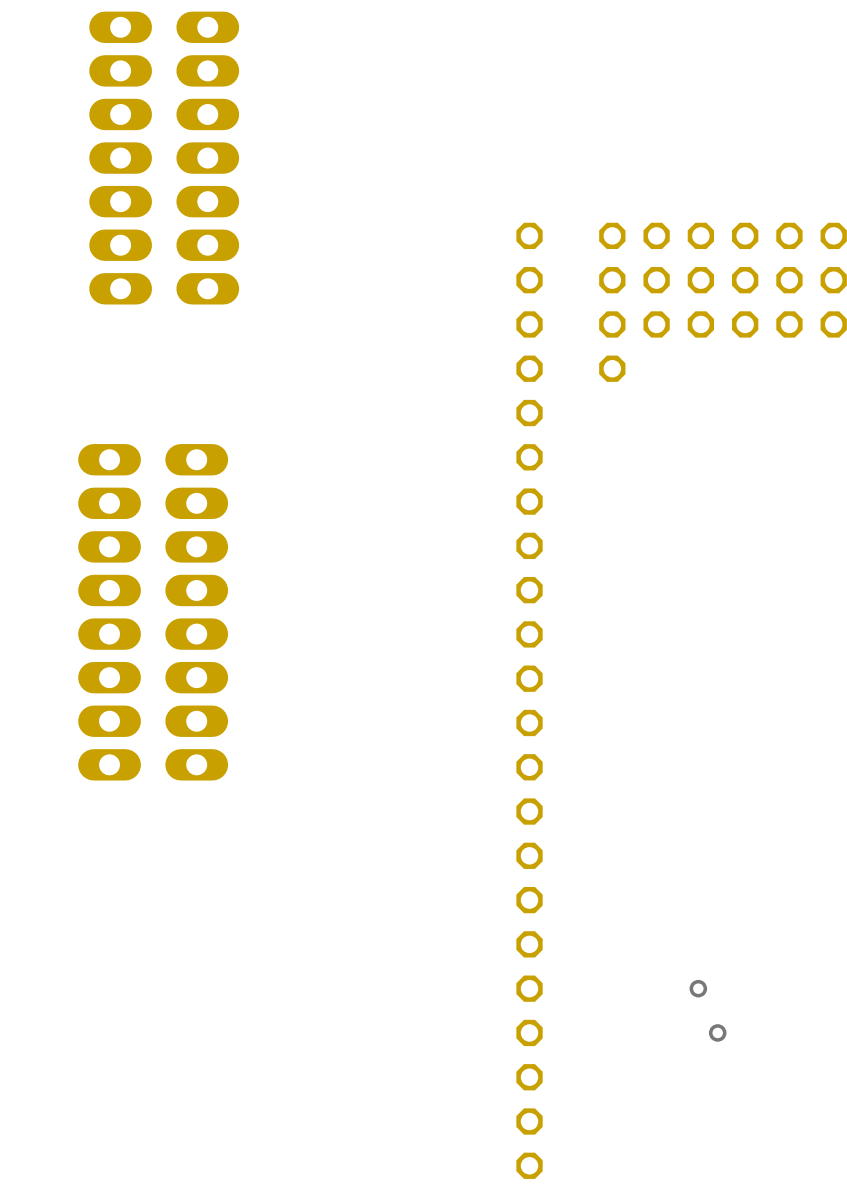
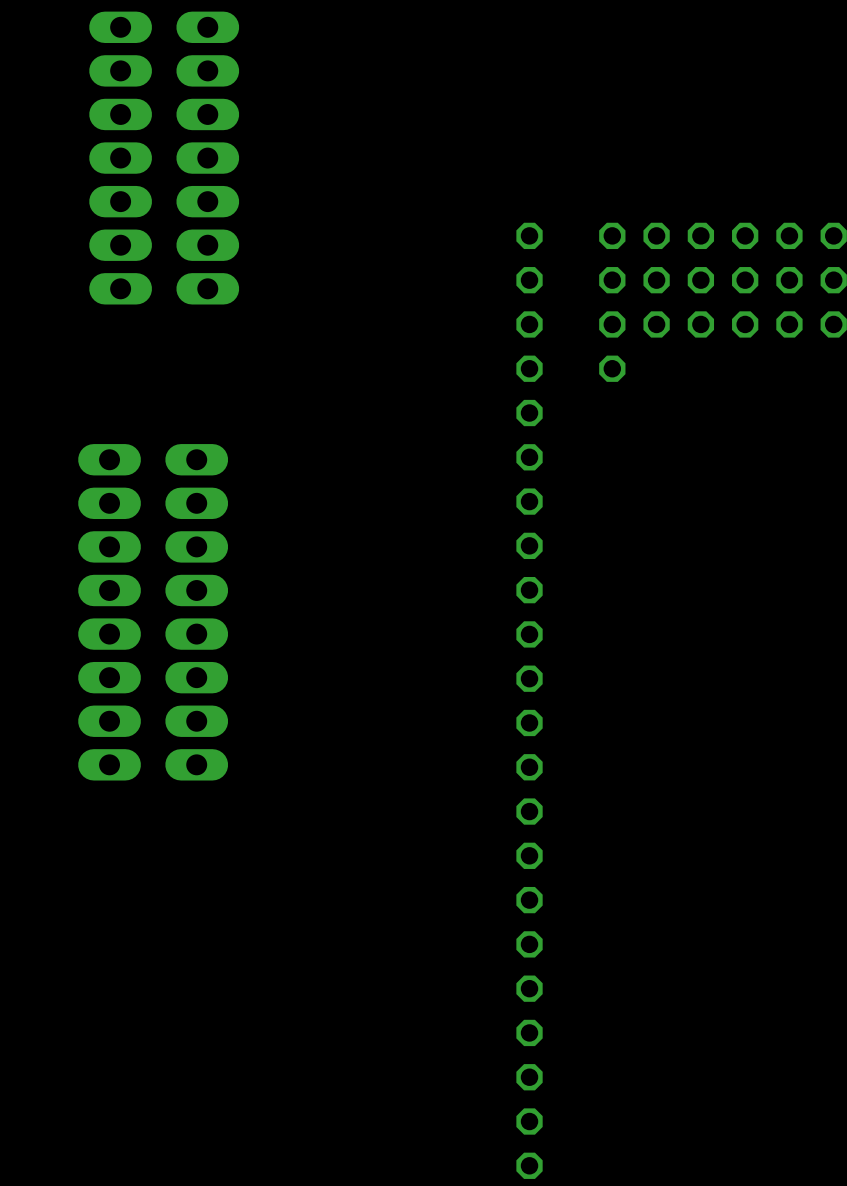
via: (698, 988) -> none
via: (717, 1032) -> none

